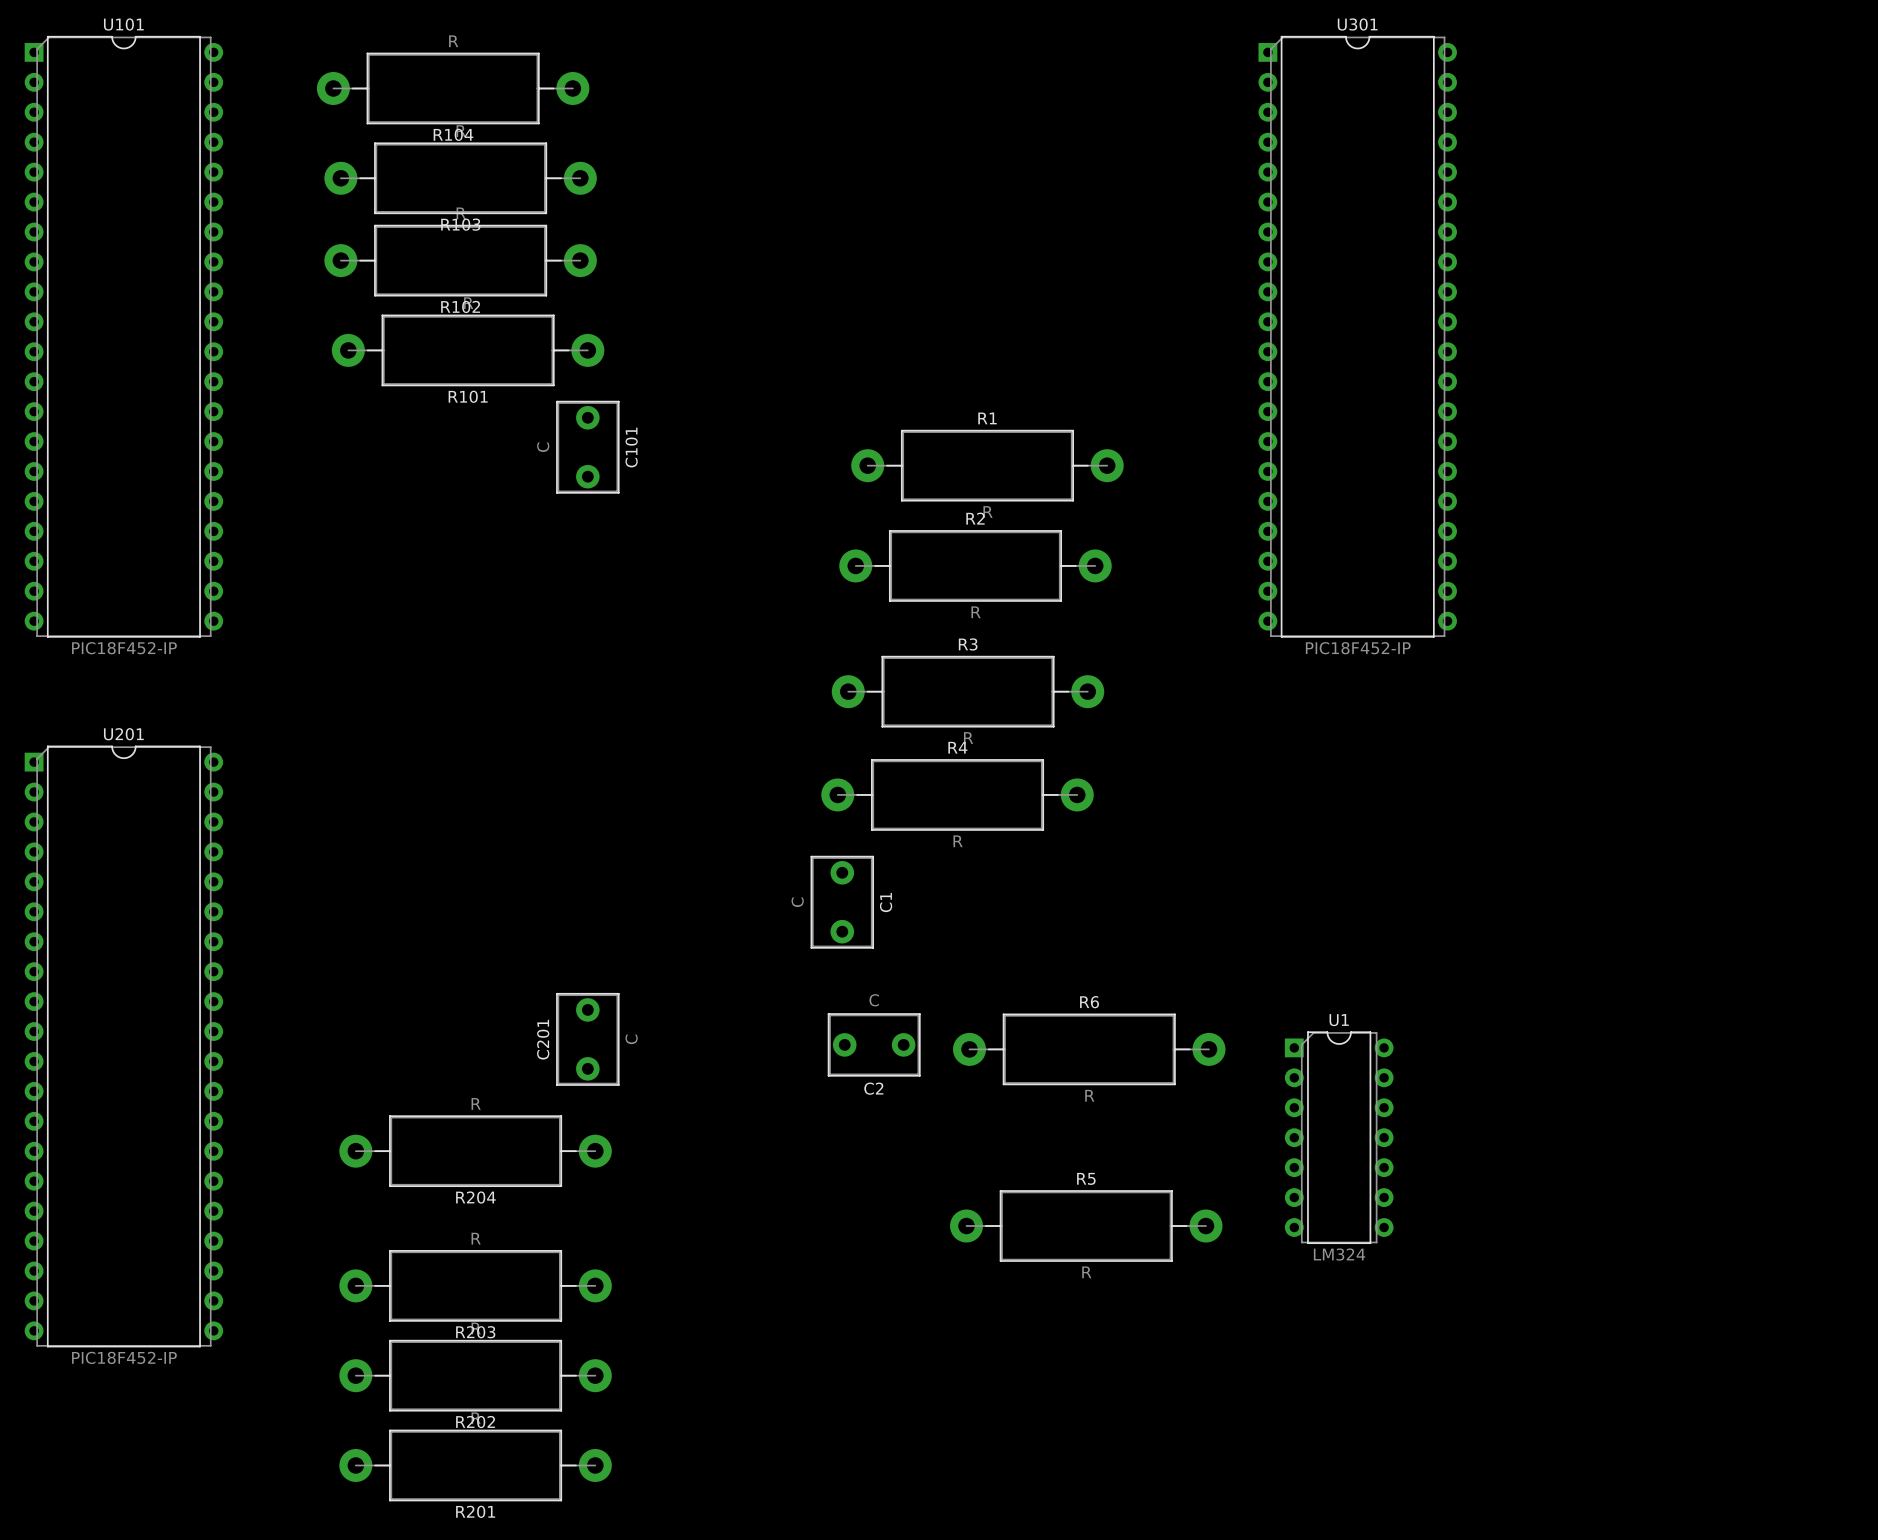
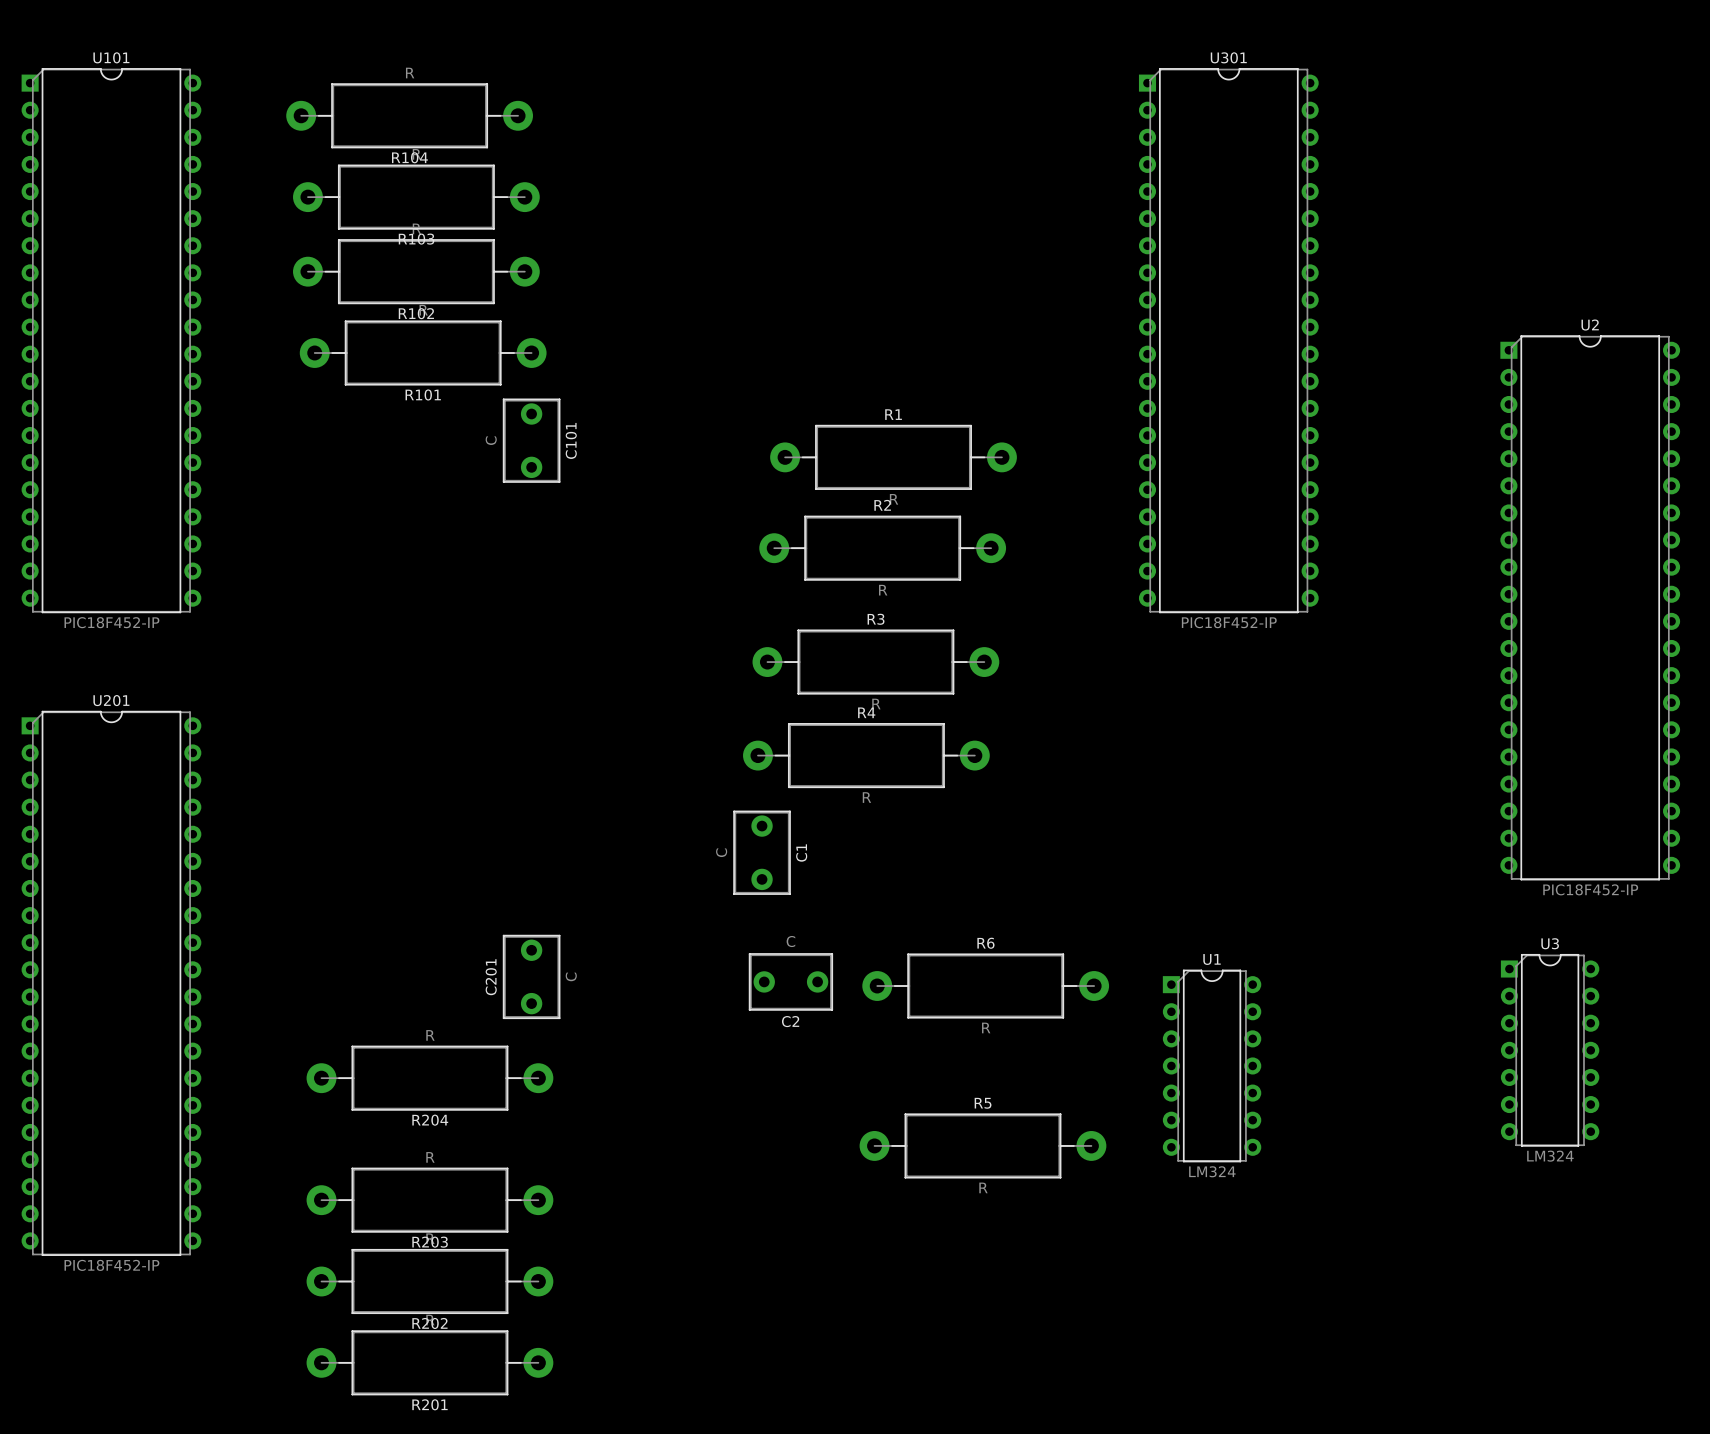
U2: none -> PIC18F452-IP (1590, 607)
U3: none -> LM324 (1550, 1050)

